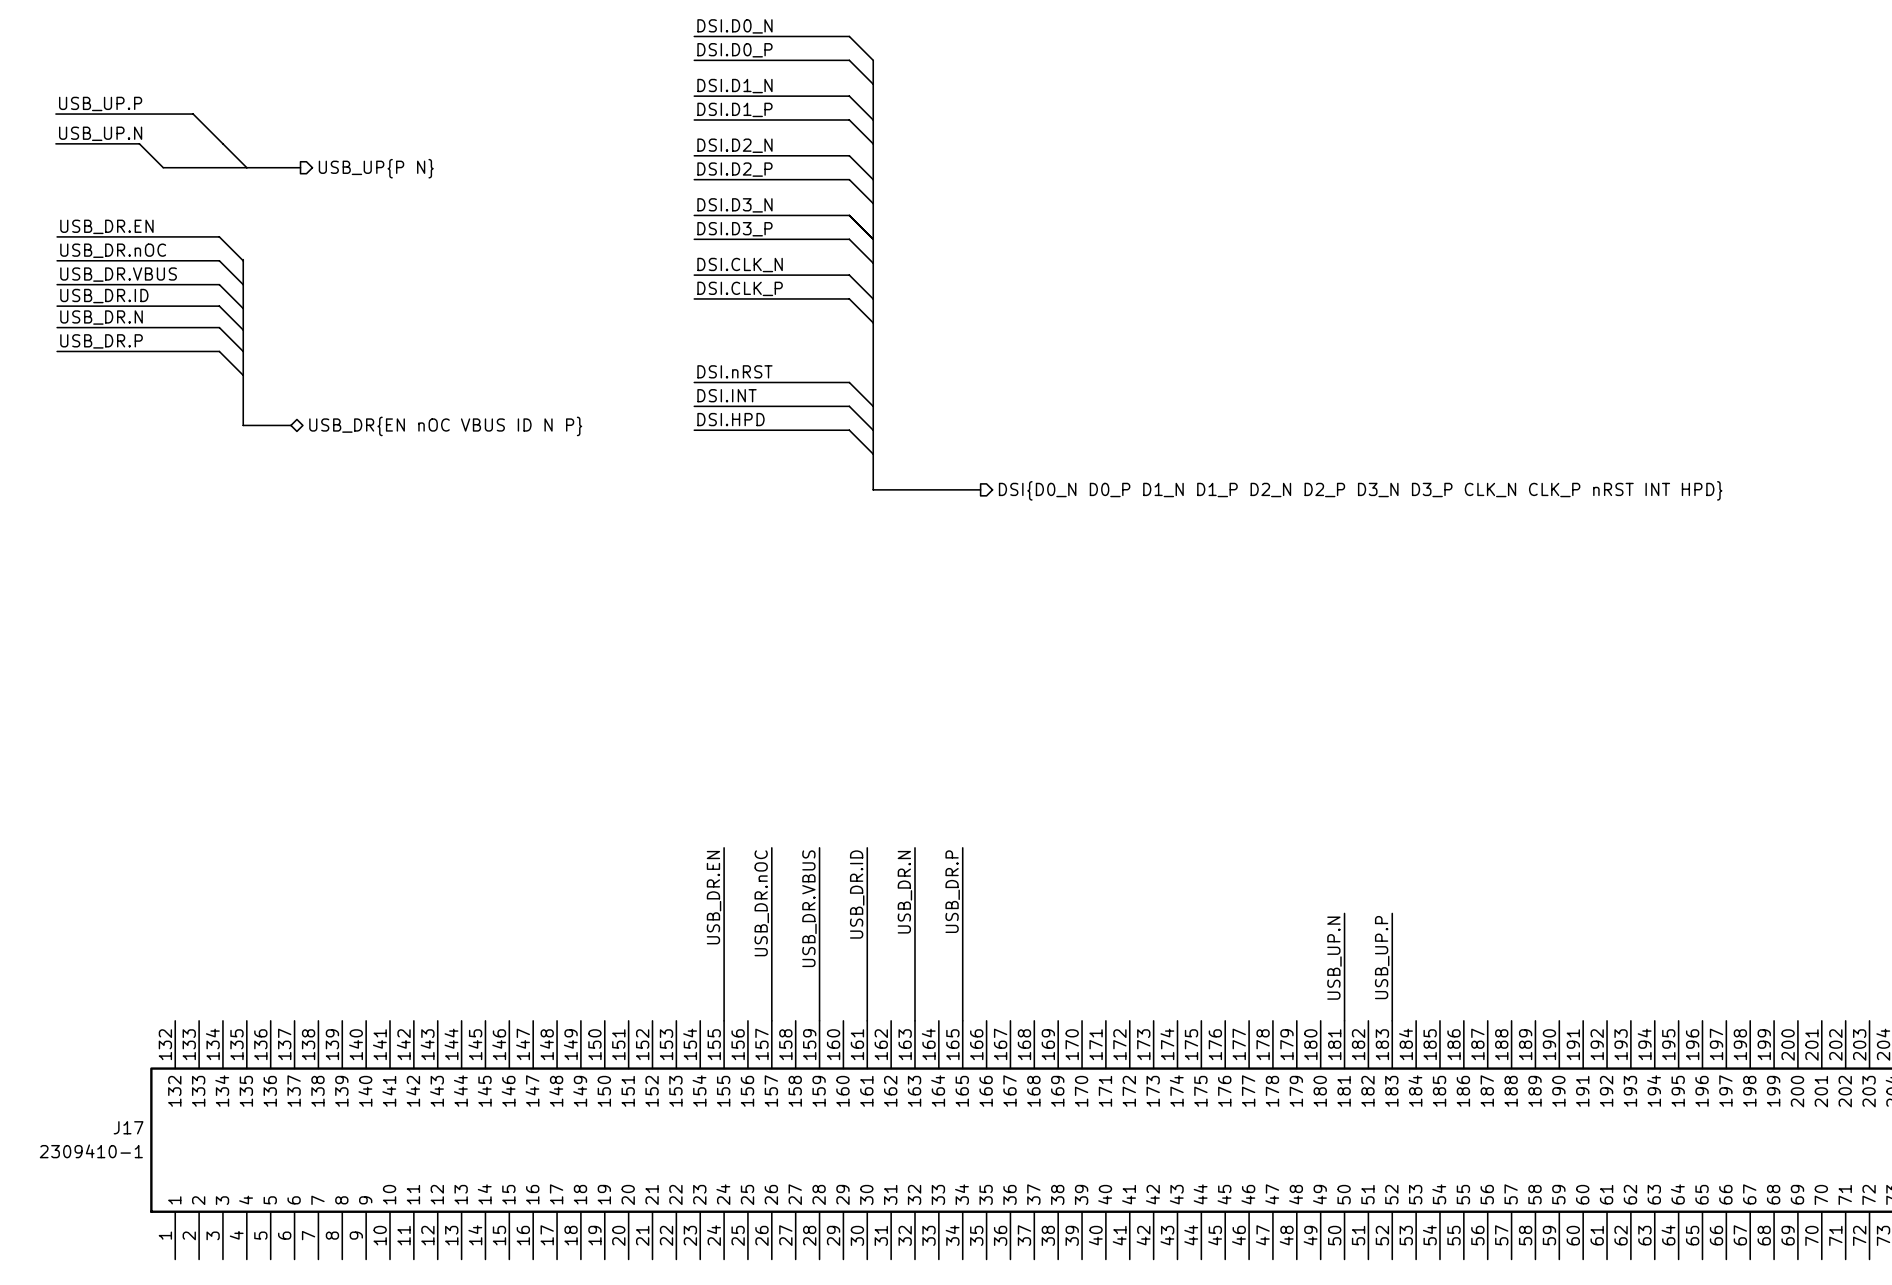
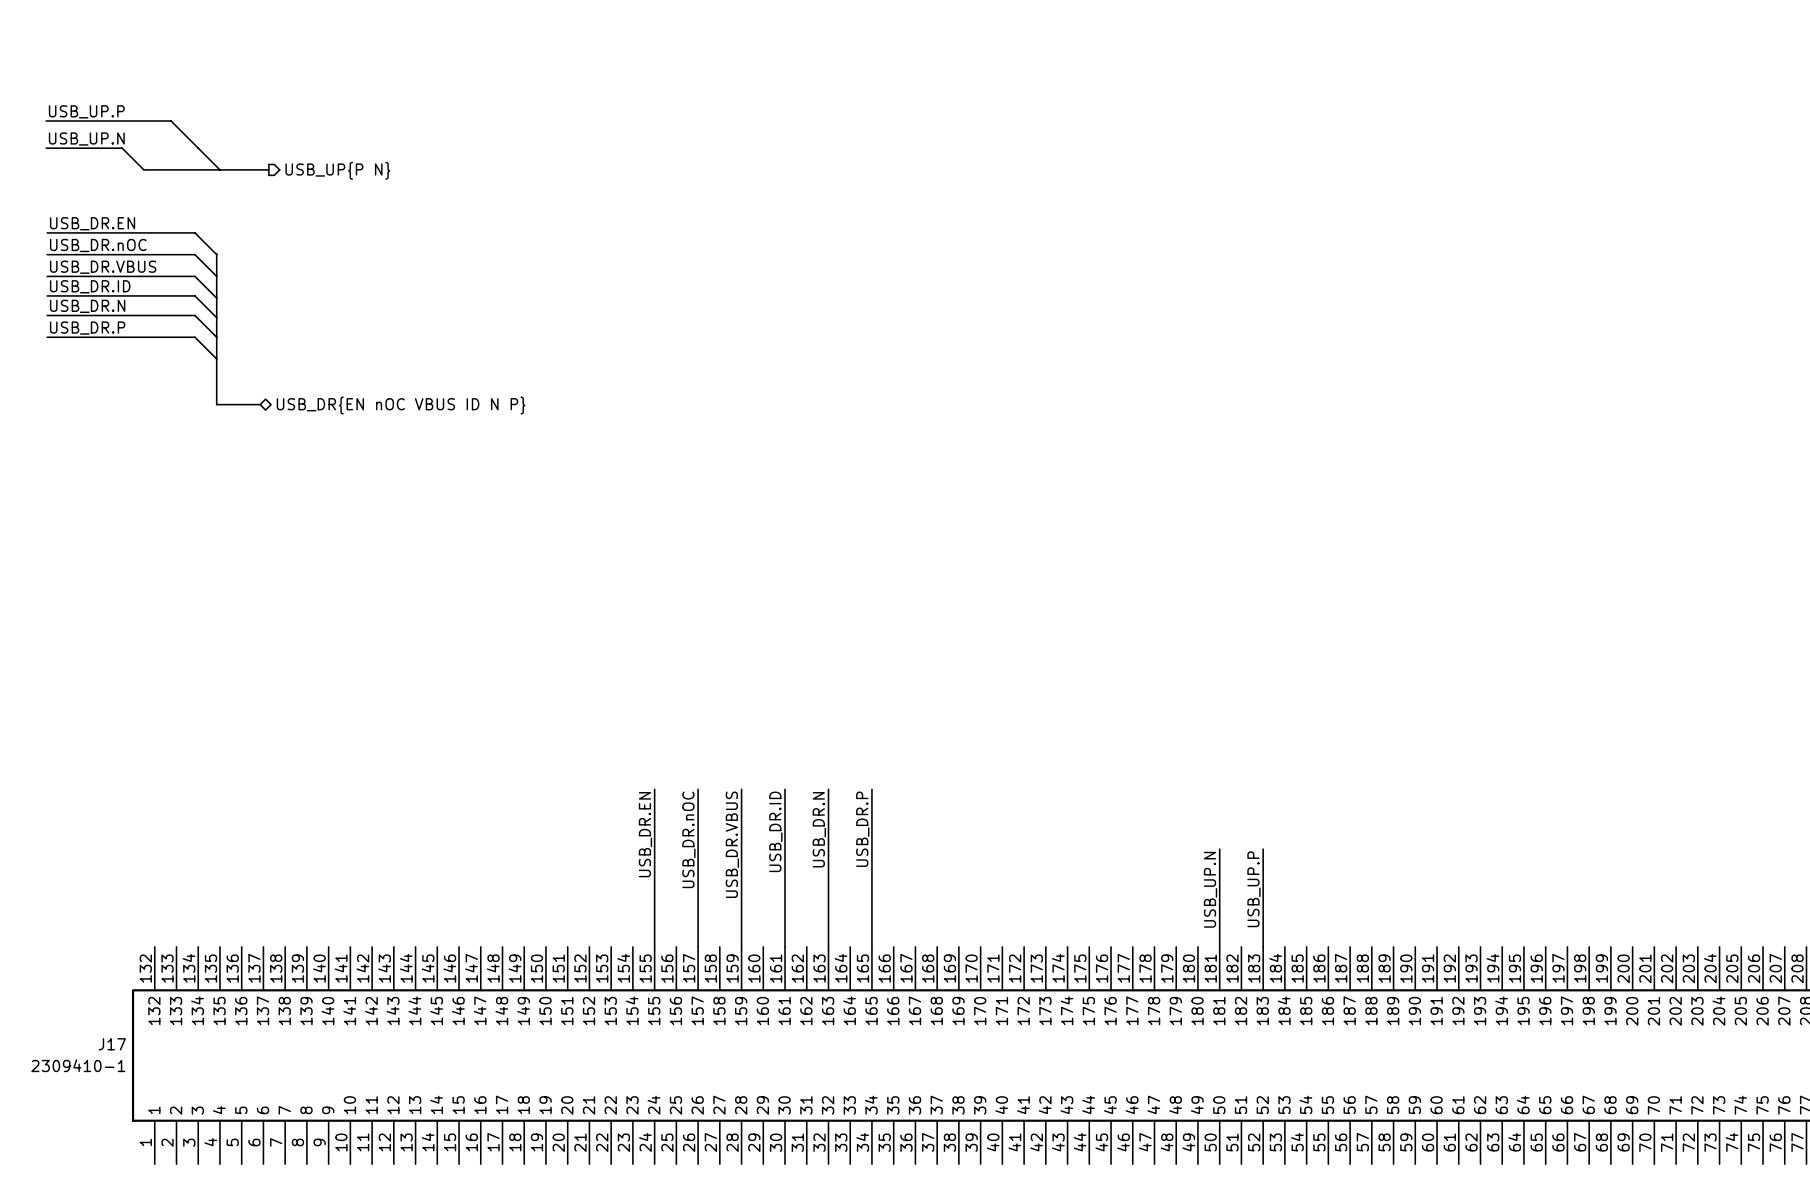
label: DSI.D0_N (734, 26) -> none
wire: (694, 36) (849, 36) (873, 60) -> none
label: DSI.D0_P (734, 50) -> none
wire: (694, 60) (849, 60) (873, 84) -> none
bus: (873, 60) (873, 489) (980, 489) -> none
label: DSI.D1_N (734, 86) -> none
wire: (694, 96) (849, 96) (873, 120) -> none
label: DSI.D1_P (734, 109) -> none
wire: (694, 120) (849, 120) (873, 143) -> none
label: DSI.D2_N (734, 145) -> none
wire: (694, 155) (849, 155) (873, 179) -> none
label: DSI.D2_P (734, 169) -> none
wire: (694, 179) (849, 179) (873, 203) -> none
label: DSI.D3_N (734, 205) -> none
wire: (694, 215) (849, 215) (873, 239) -> none
label: DSI.D3_P (734, 229) -> none
wire: (694, 239) (849, 239) (873, 263) -> none
label: DSI.CLK_N (740, 265) -> none
wire: (694, 275) (849, 275) (873, 298) -> none
label: DSI.CLK_P (740, 288) -> none
wire: (694, 298) (849, 298) (873, 322) -> none
label: DSI.nRST (734, 371) -> none
wire: (694, 382) (849, 382) (873, 406) -> none
label: DSI.INT (727, 395) -> none
wire: (694, 406) (849, 406) (873, 430) -> none
label: DSI.HPD (730, 419) -> none
wire: (694, 430) (849, 430) (873, 454) -> none
hierarchical label: DSI{D0_N D0_P D1_N D1_P D2_N D2_P D3_N D3_P CLK_N CLK_P nRST INT HPD} (1360, 490) -> none

